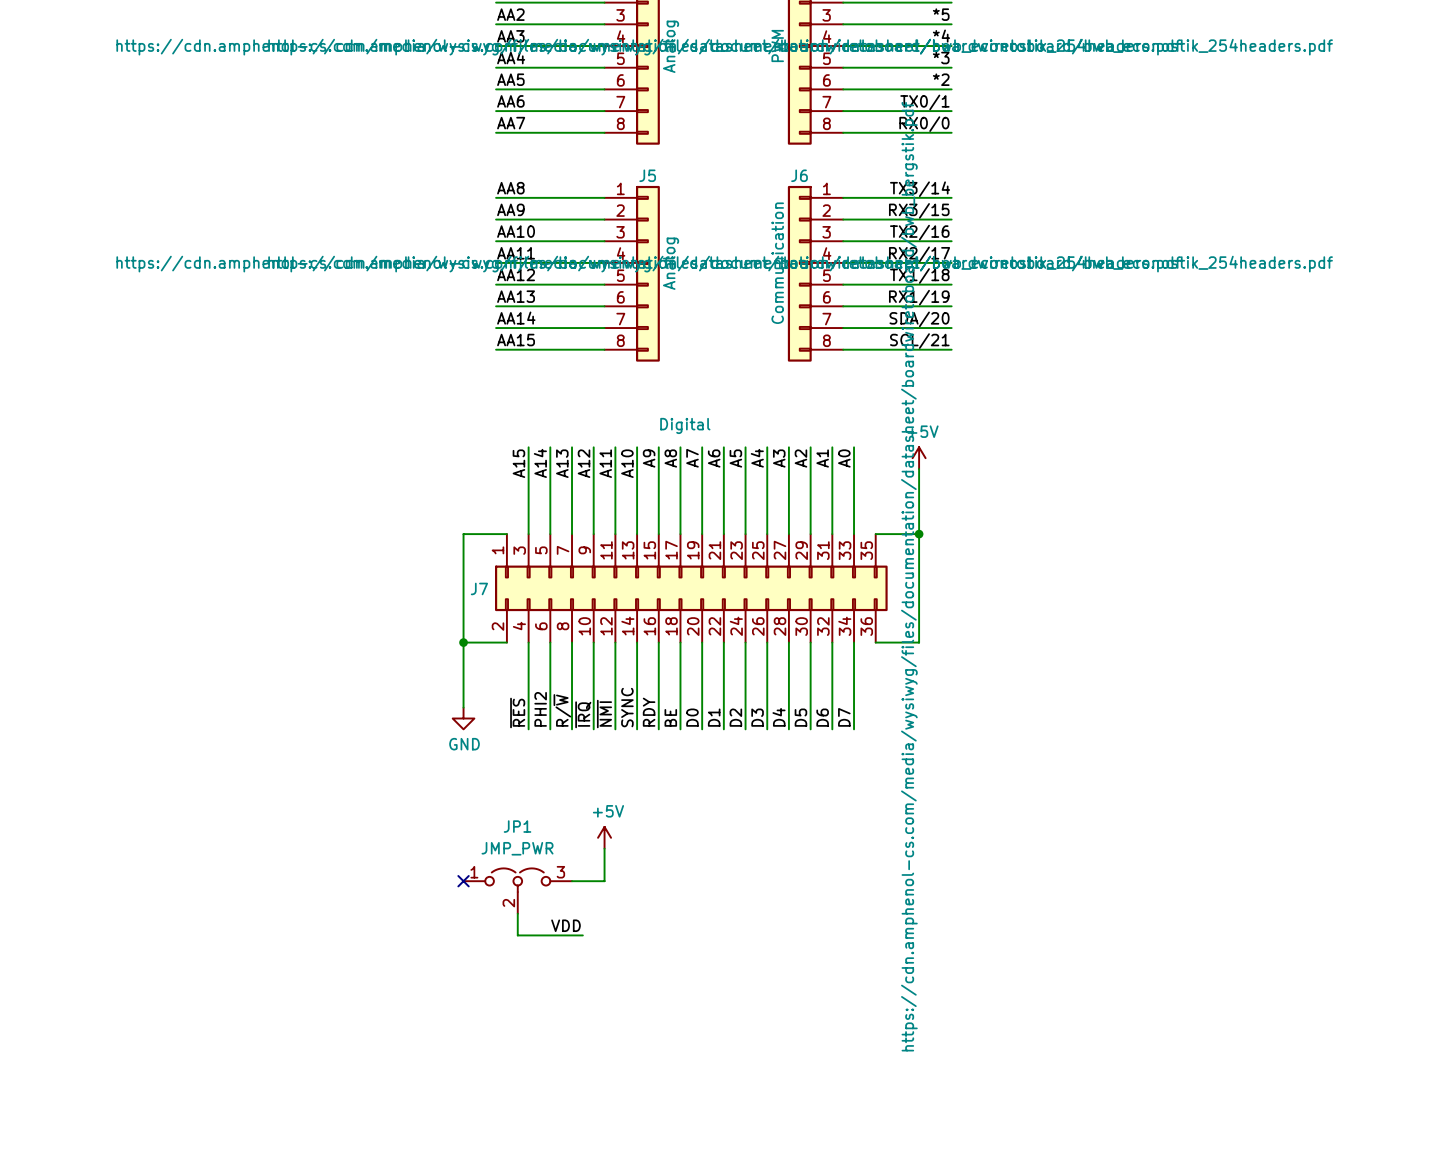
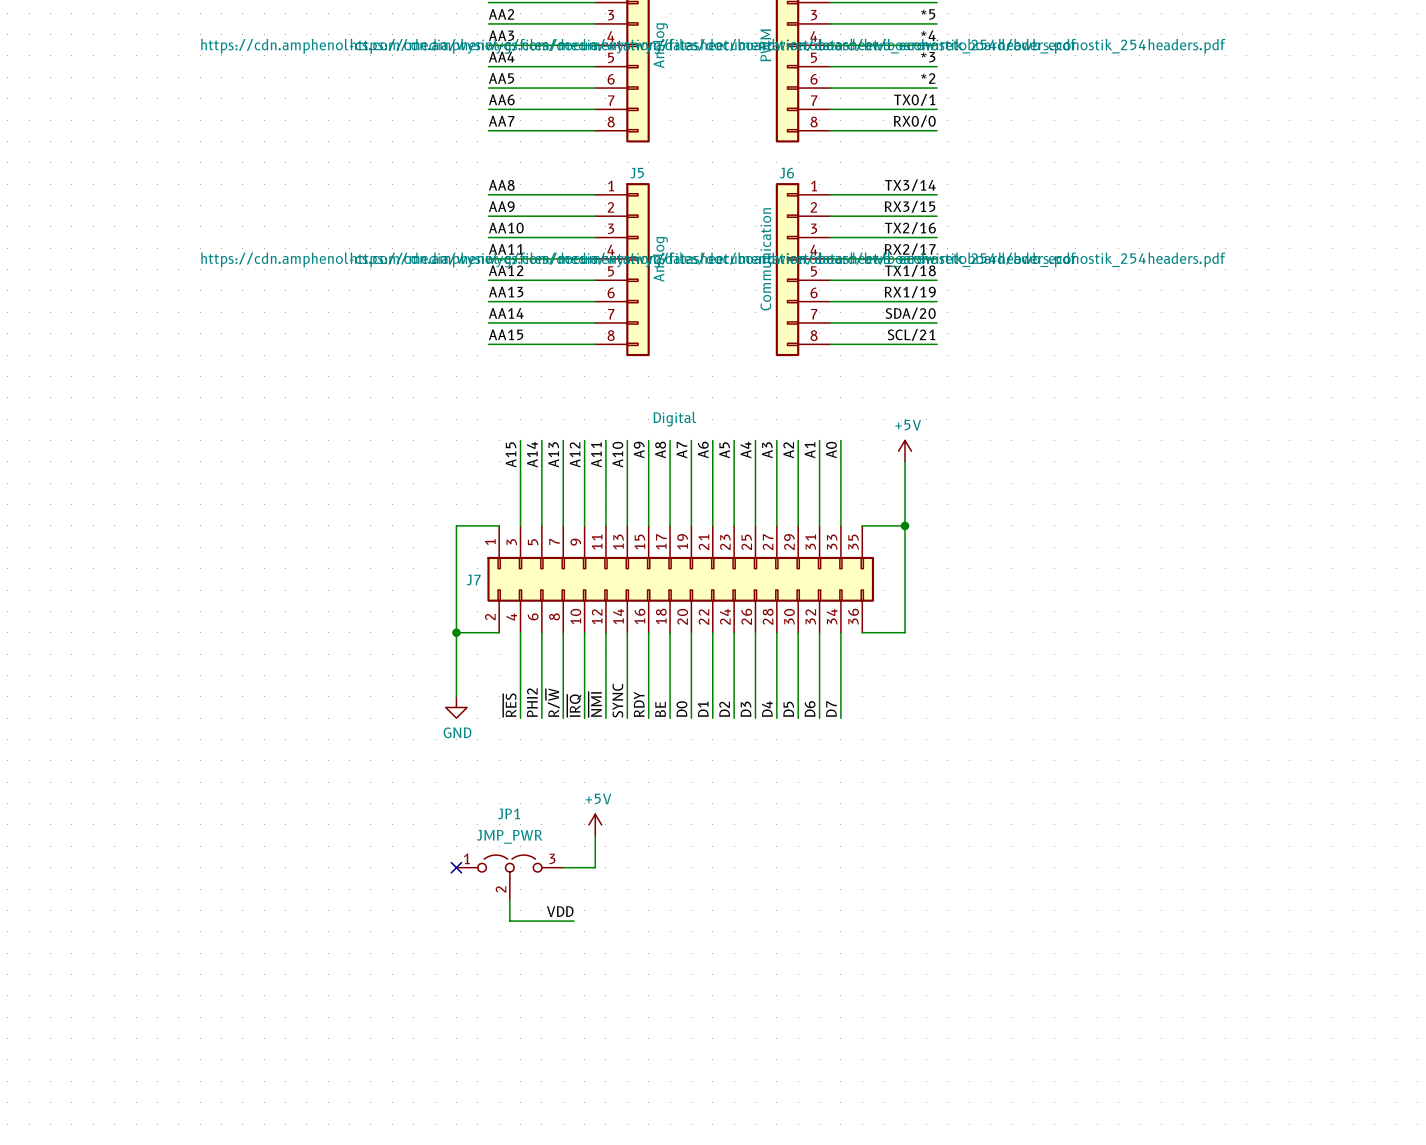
J7 text: https://cdn.amphenol-cs.com/media/wysiwyg/files/documentation/datasheet/boardwiretoboard/bwb_bergstik.pdf (909, 576) -> none

